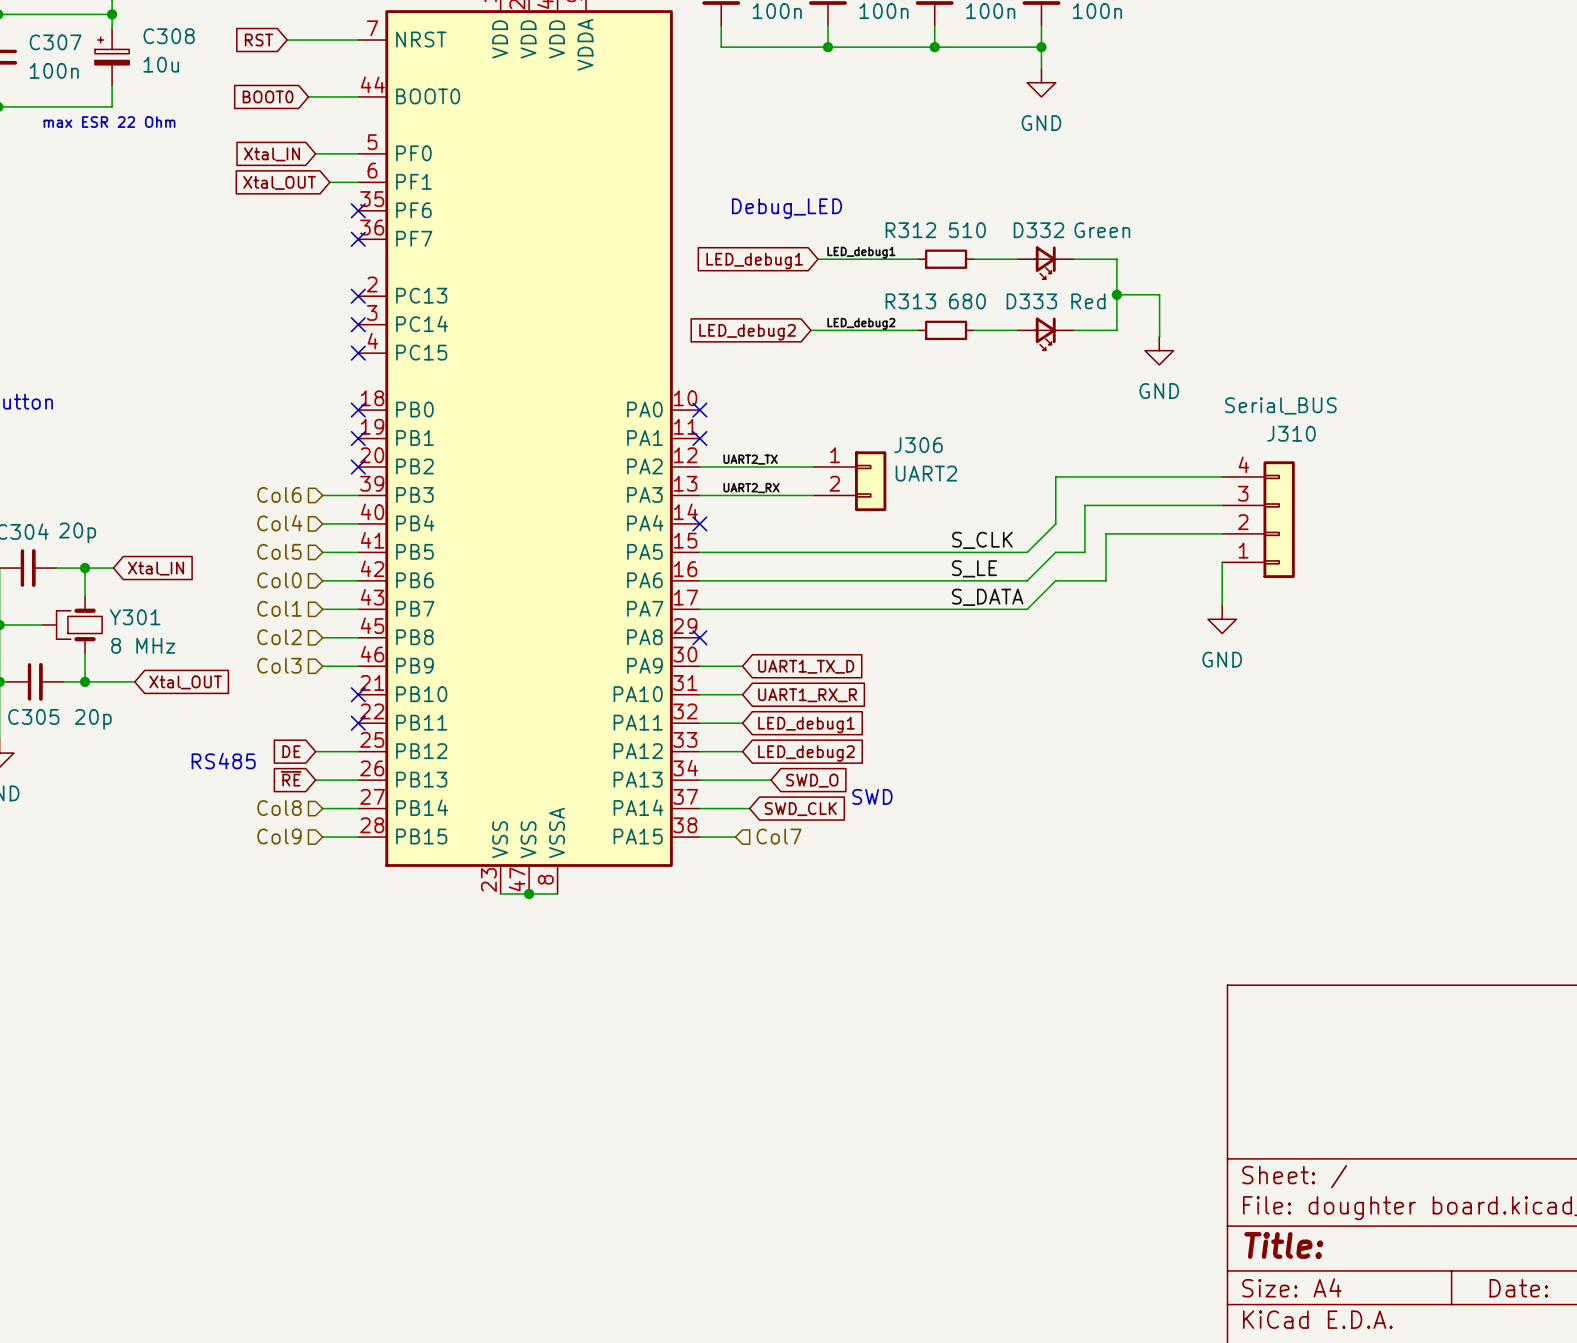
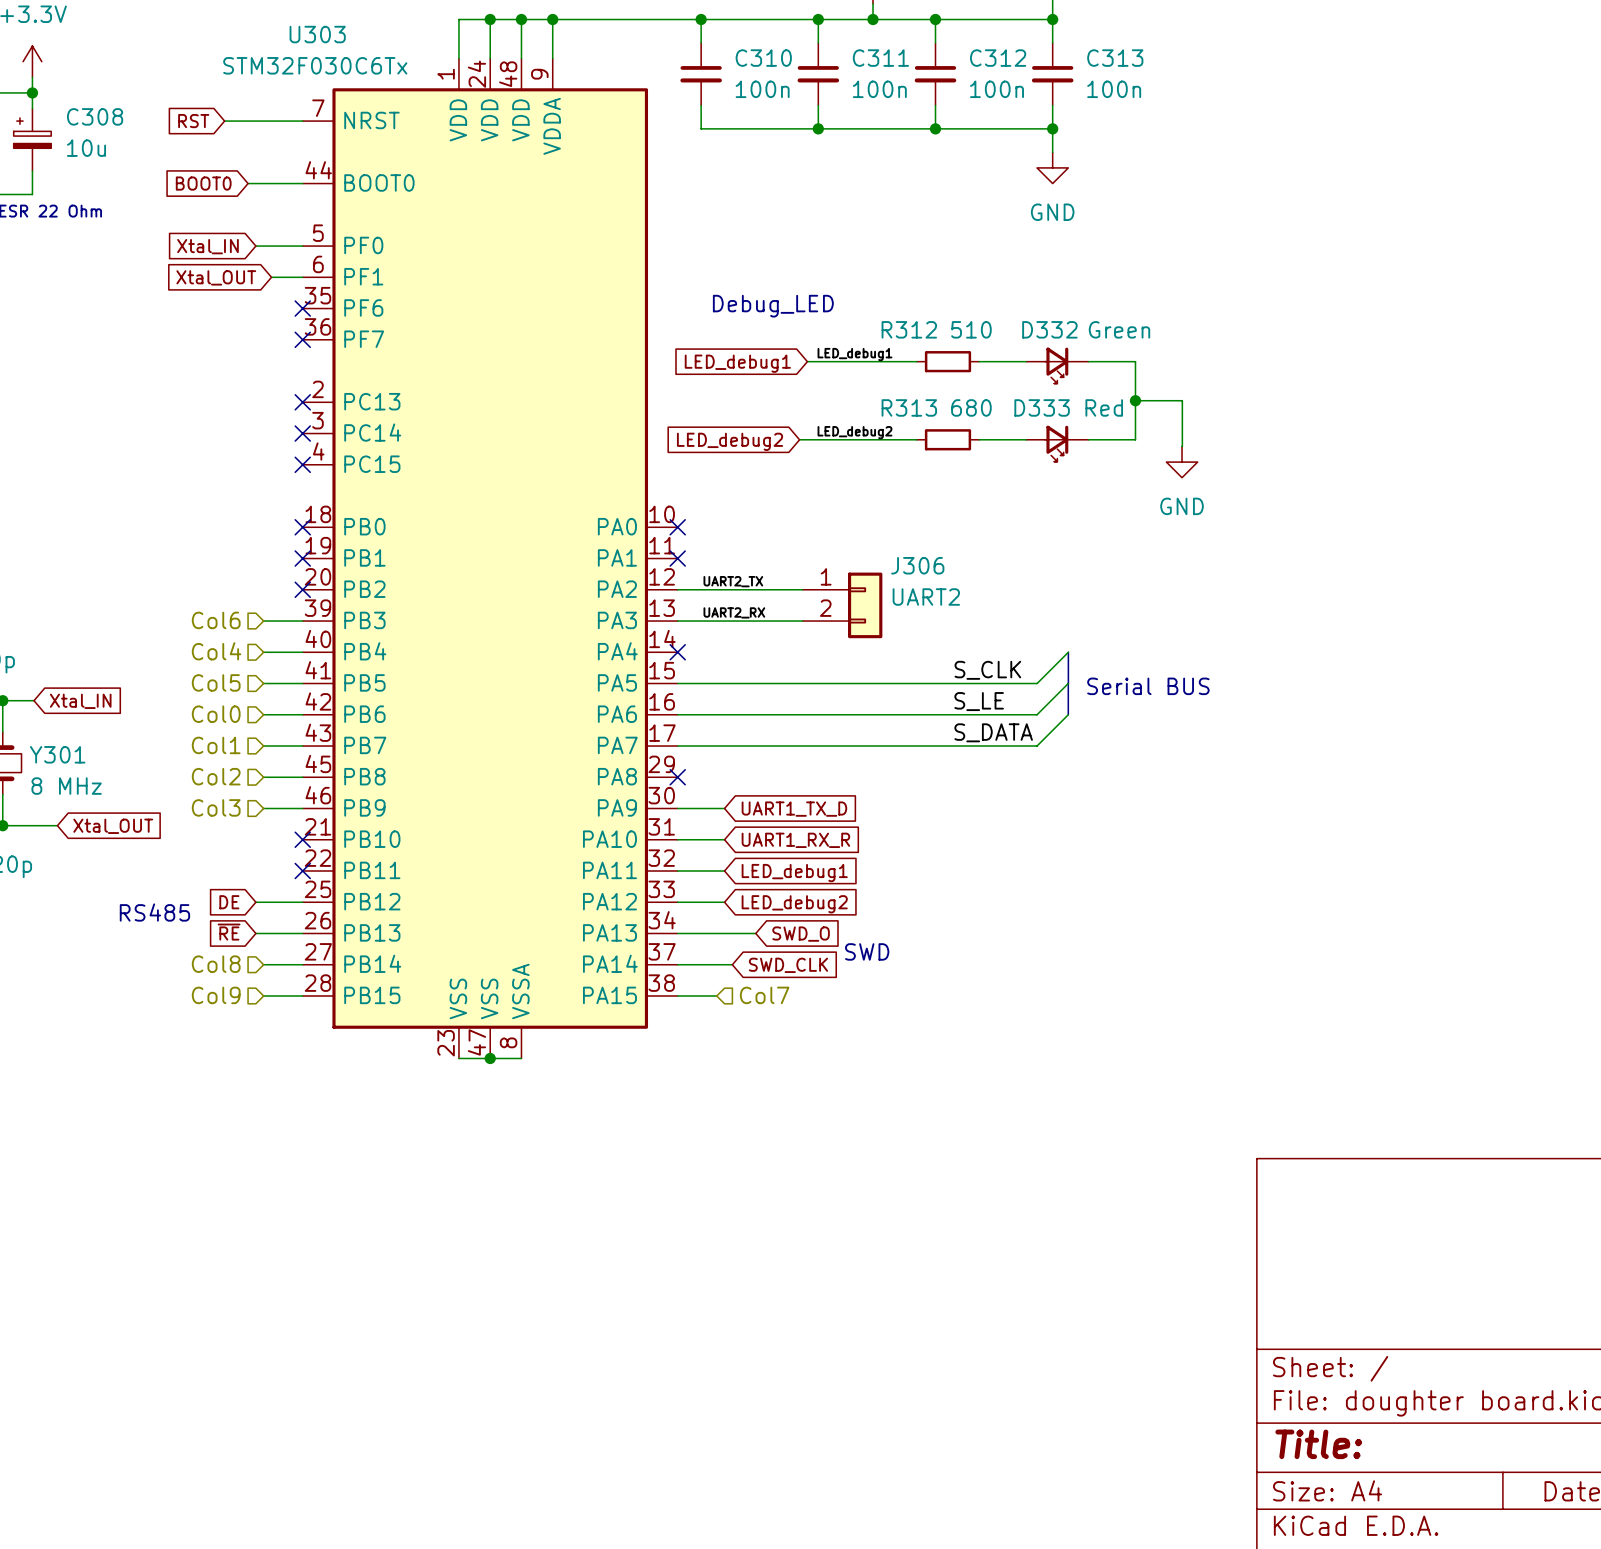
wire: (1222, 476) (1055, 476) (1055, 523) -> none
wire: (1222, 505) (1084, 505) (1084, 552) (1055, 552) -> none
J310: Serial_BUS (1258, 519) -> none
bus: none -> (1068, 652) (1068, 683)
wire: (1222, 533) (1106, 533) (1106, 580) (1055, 580) -> none
bus: none -> (1068, 683) (1068, 714)
text: none -> Serial BUS (1148, 686)
wire: (1222, 562) (1222, 605) -> none
power symbol: GND (1222, 619) -> none

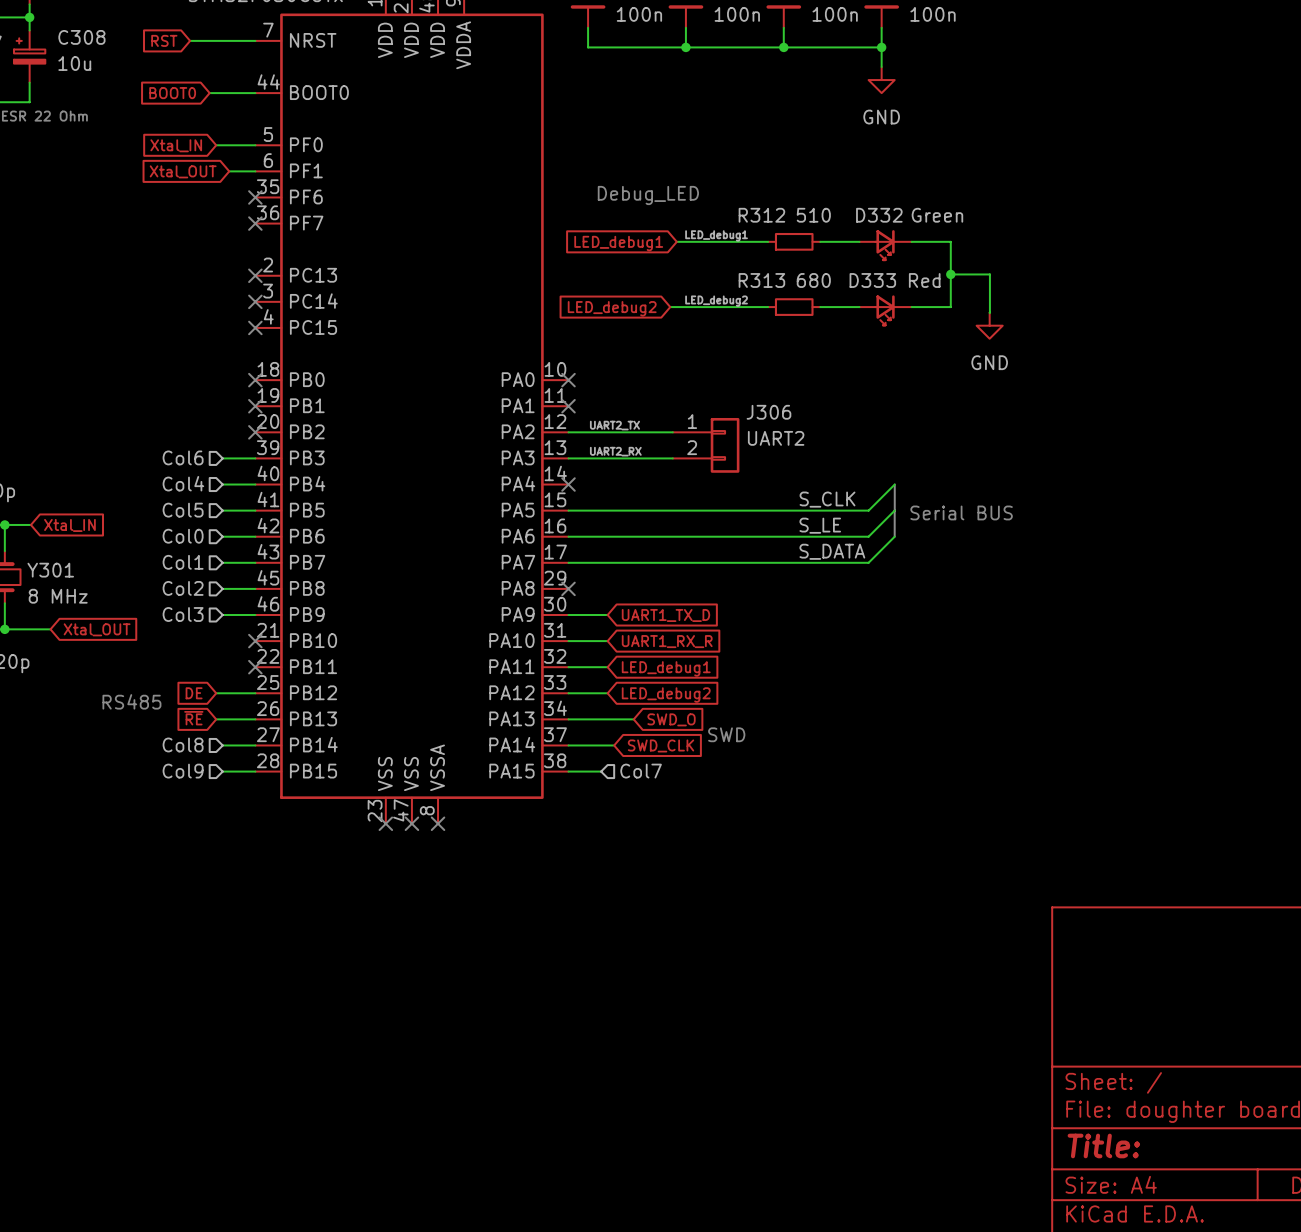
wire: (458, 1058) (521, 1058) -> none
no-connect mark: none -> (385, 823)
junction: (490, 1058) -> none
no-connect mark: none -> (411, 823)
no-connect mark: none -> (438, 823)

